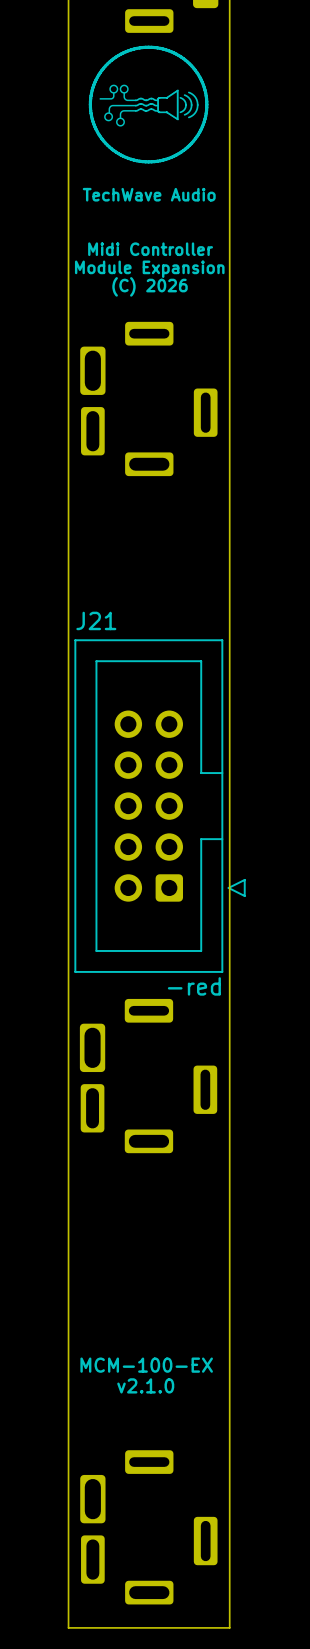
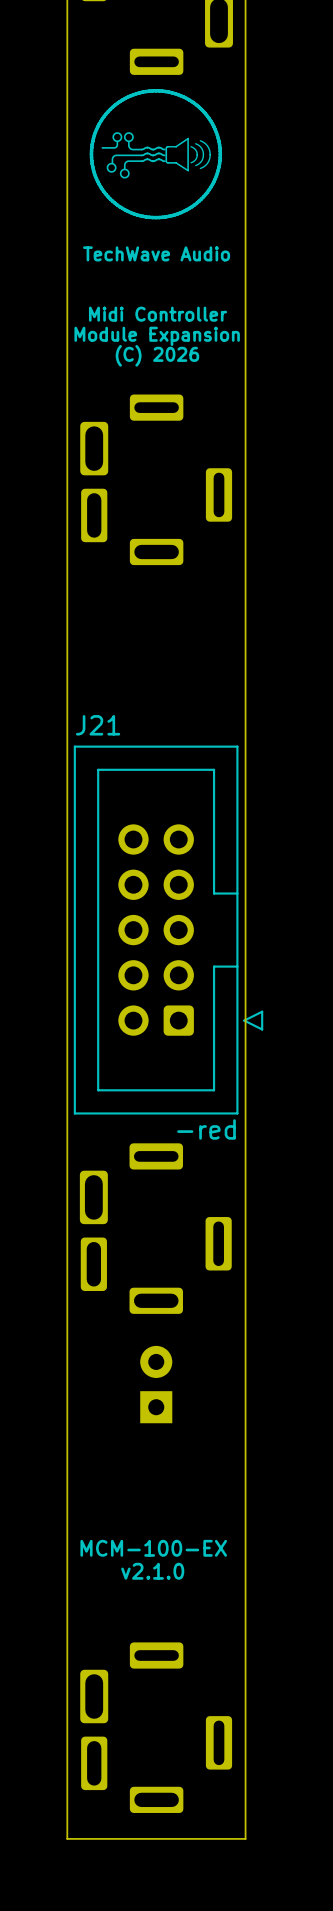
part: none -> (156, 1384)

